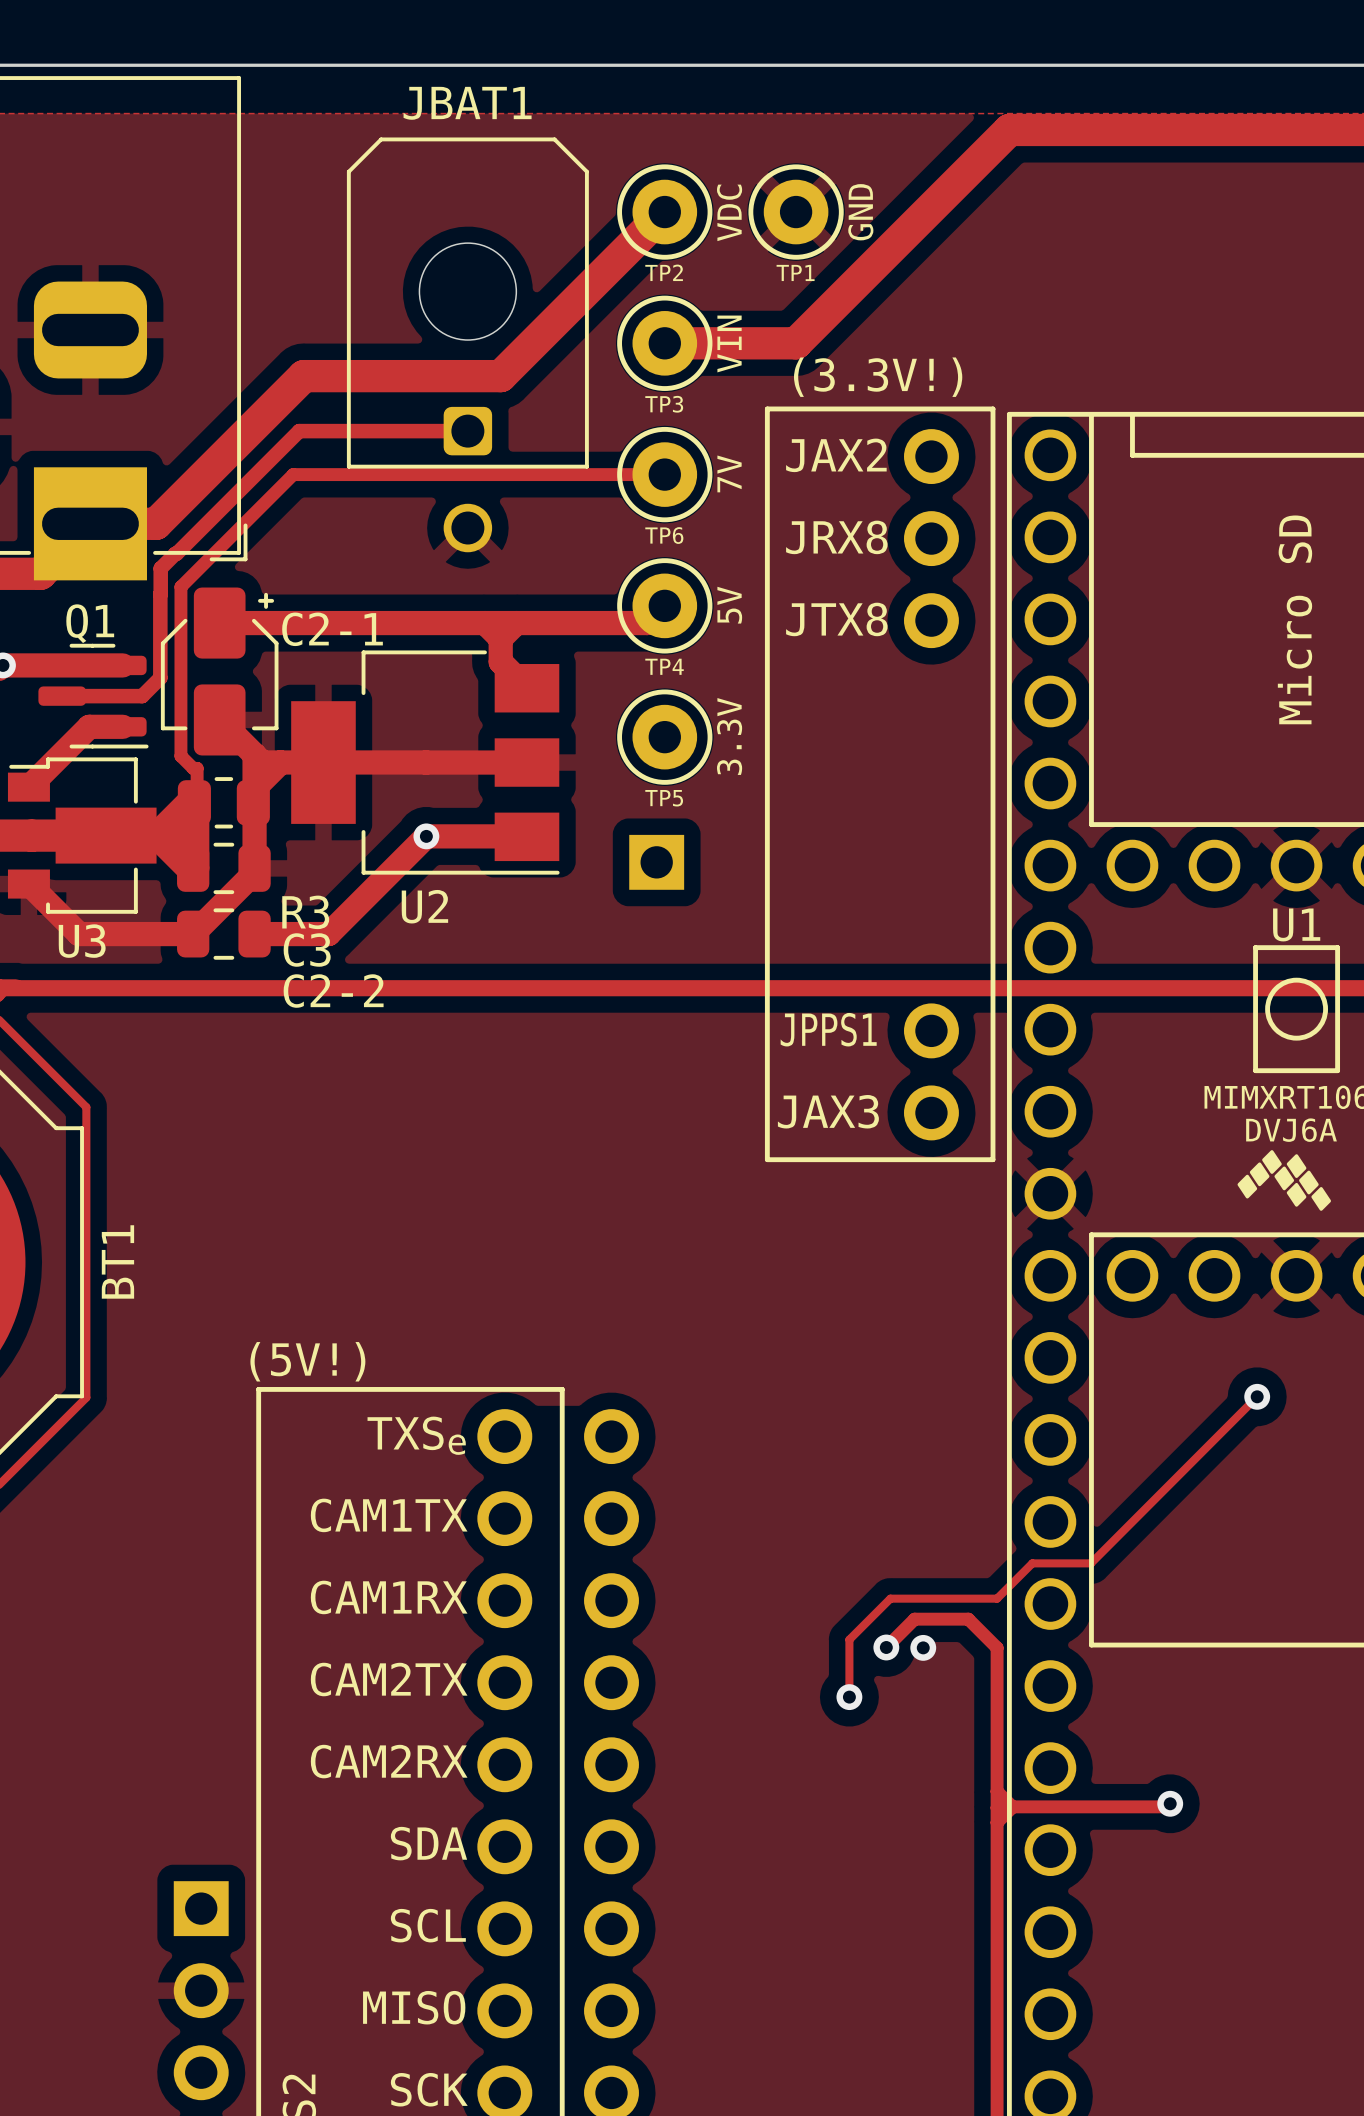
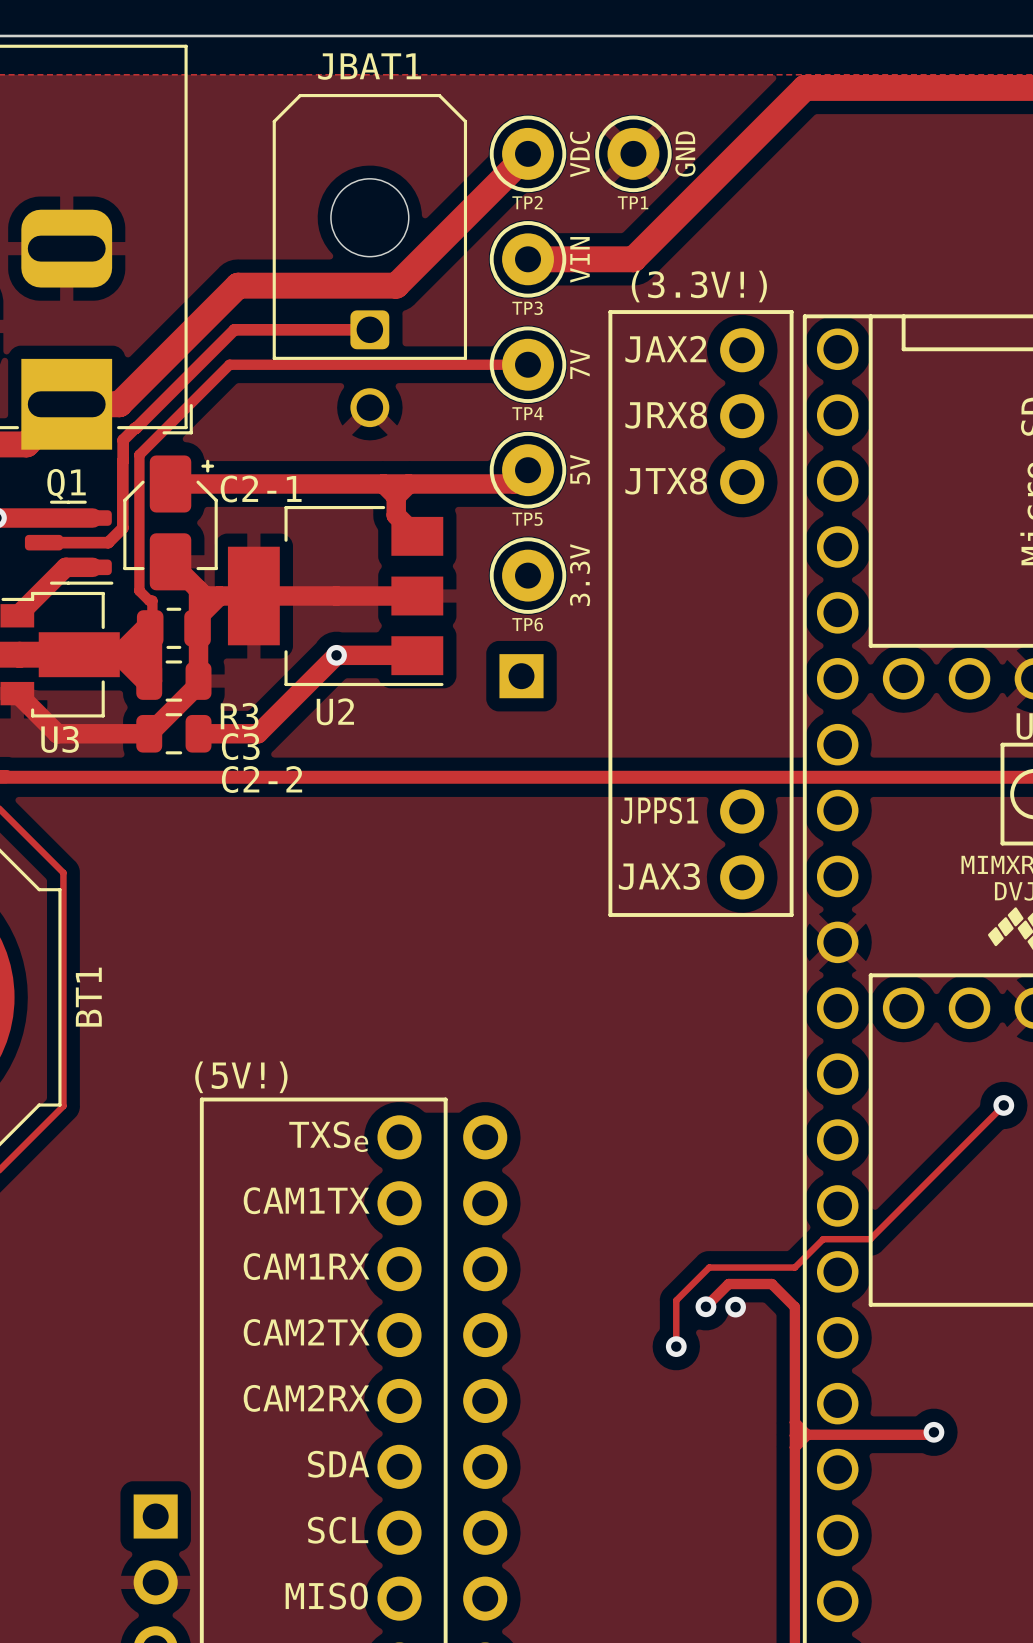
TP6 name: TP6 (664, 535) -> TP4 (527, 413)
TP4 name: TP4 (664, 666) -> TP5 (527, 519)
TP5 name: TP5 (664, 798) -> TP6 (527, 624)

